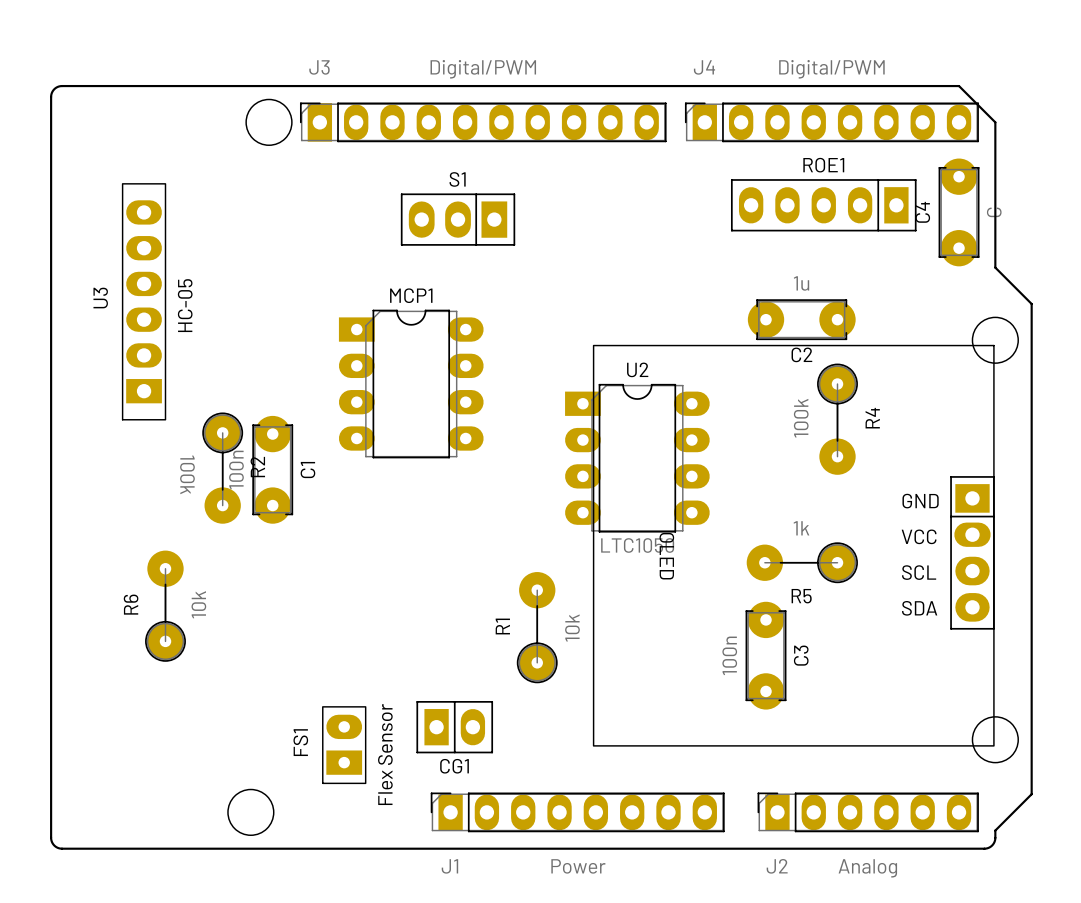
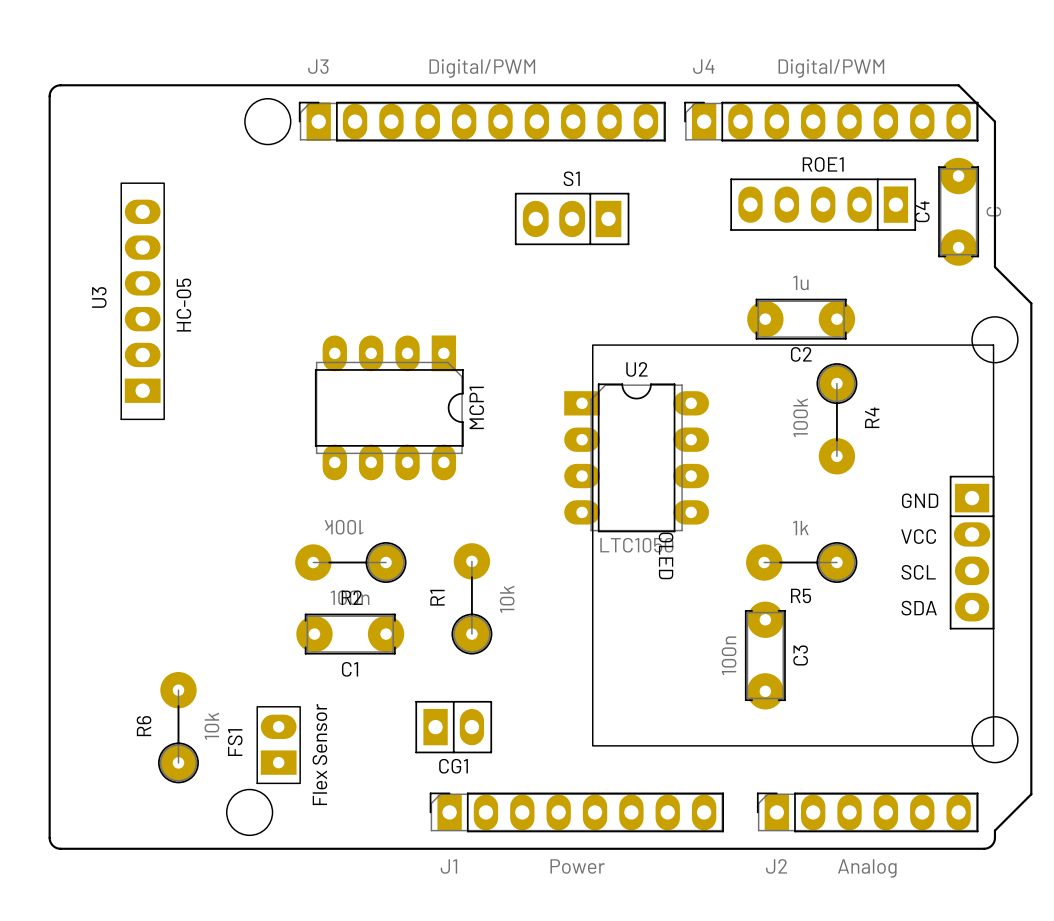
S1 position: (458, 219) -> (572, 218)
MCP1 rotation: 0° (411, 384) -> 90° clockwise (389, 407)
R2 rotation: 0° (222, 468) -> 90° clockwise (350, 562)
R2 position: (222, 468) -> (350, 562)
C1 rotation: 0° (272, 469) -> 90° clockwise (350, 634)
C1 position: (272, 469) -> (350, 634)
R6 position: (165, 606) -> (178, 727)
R1 position: (537, 627) -> (471, 598)
FS1 position: (344, 745) -> (278, 745)

